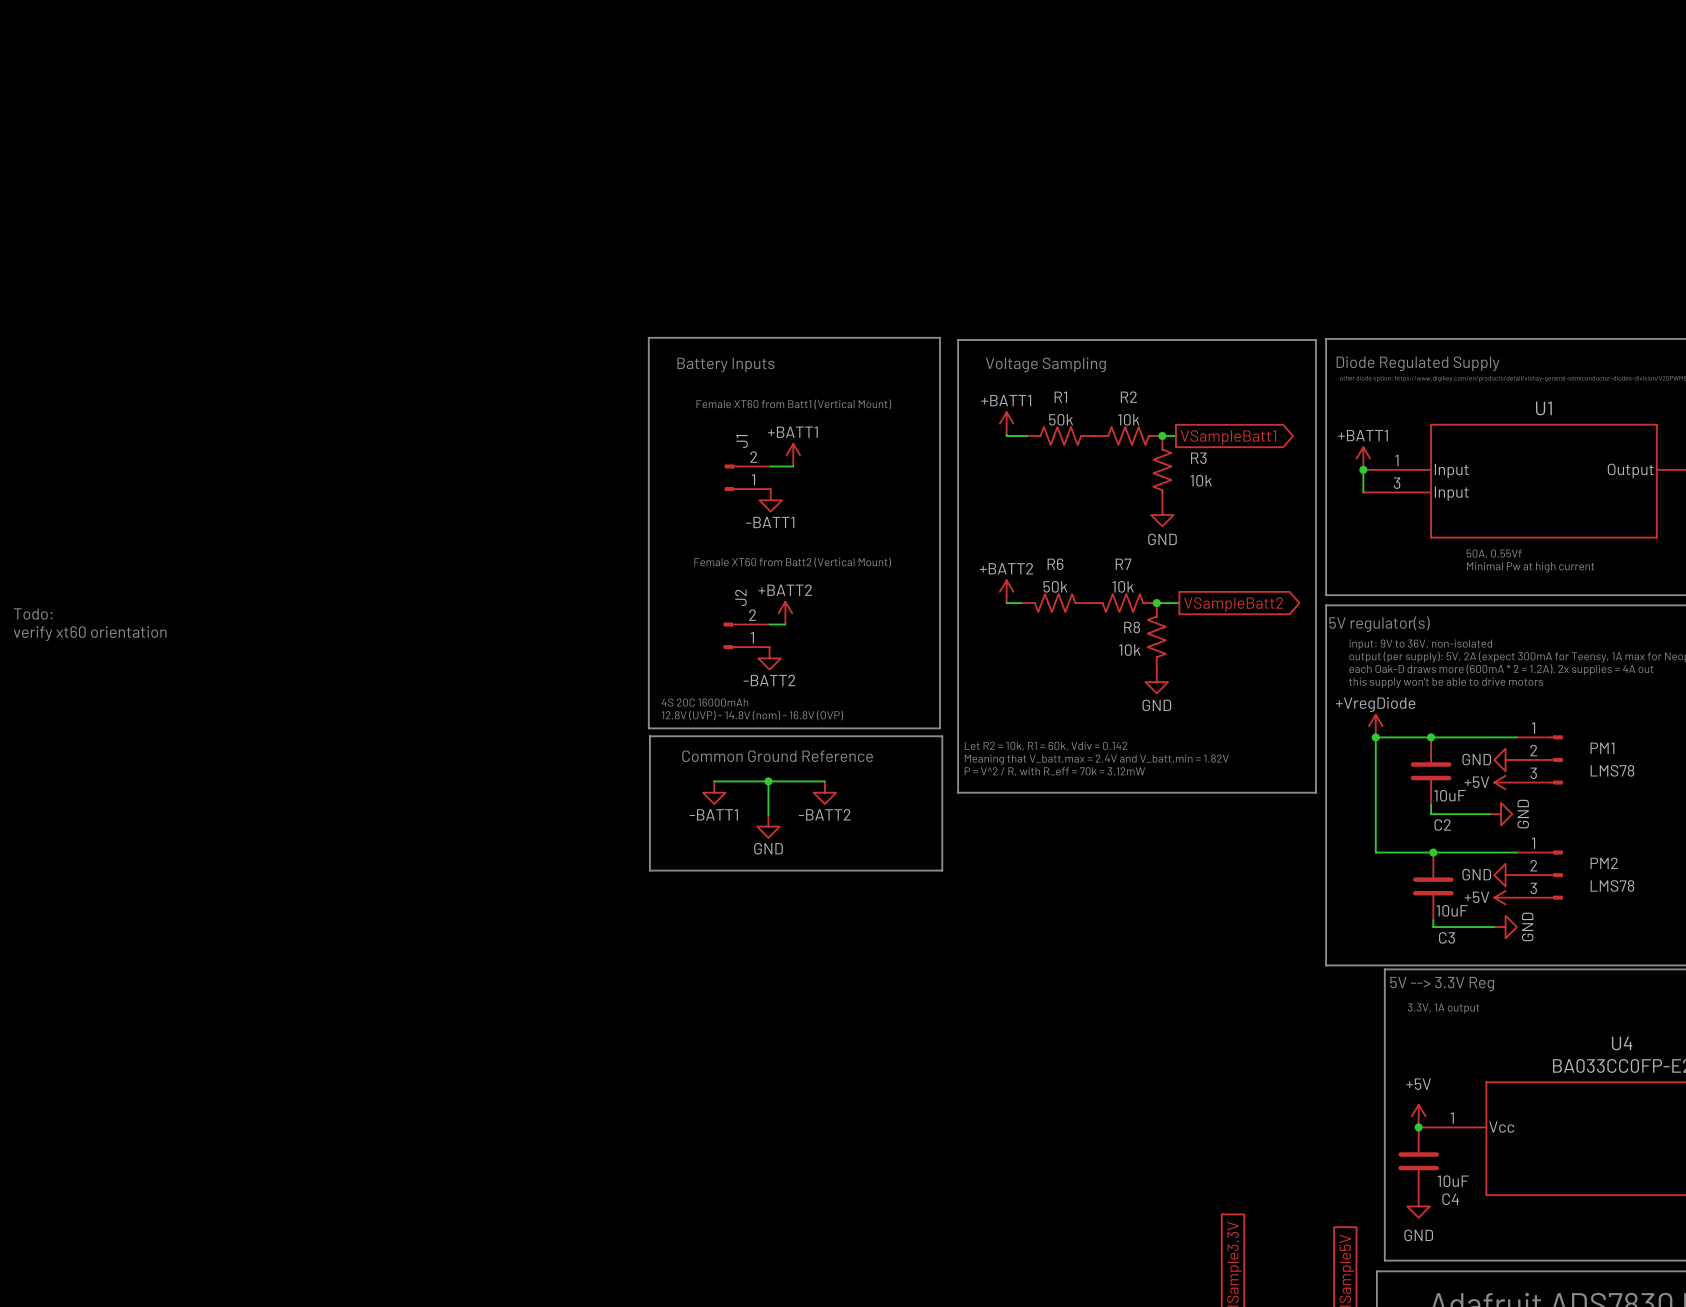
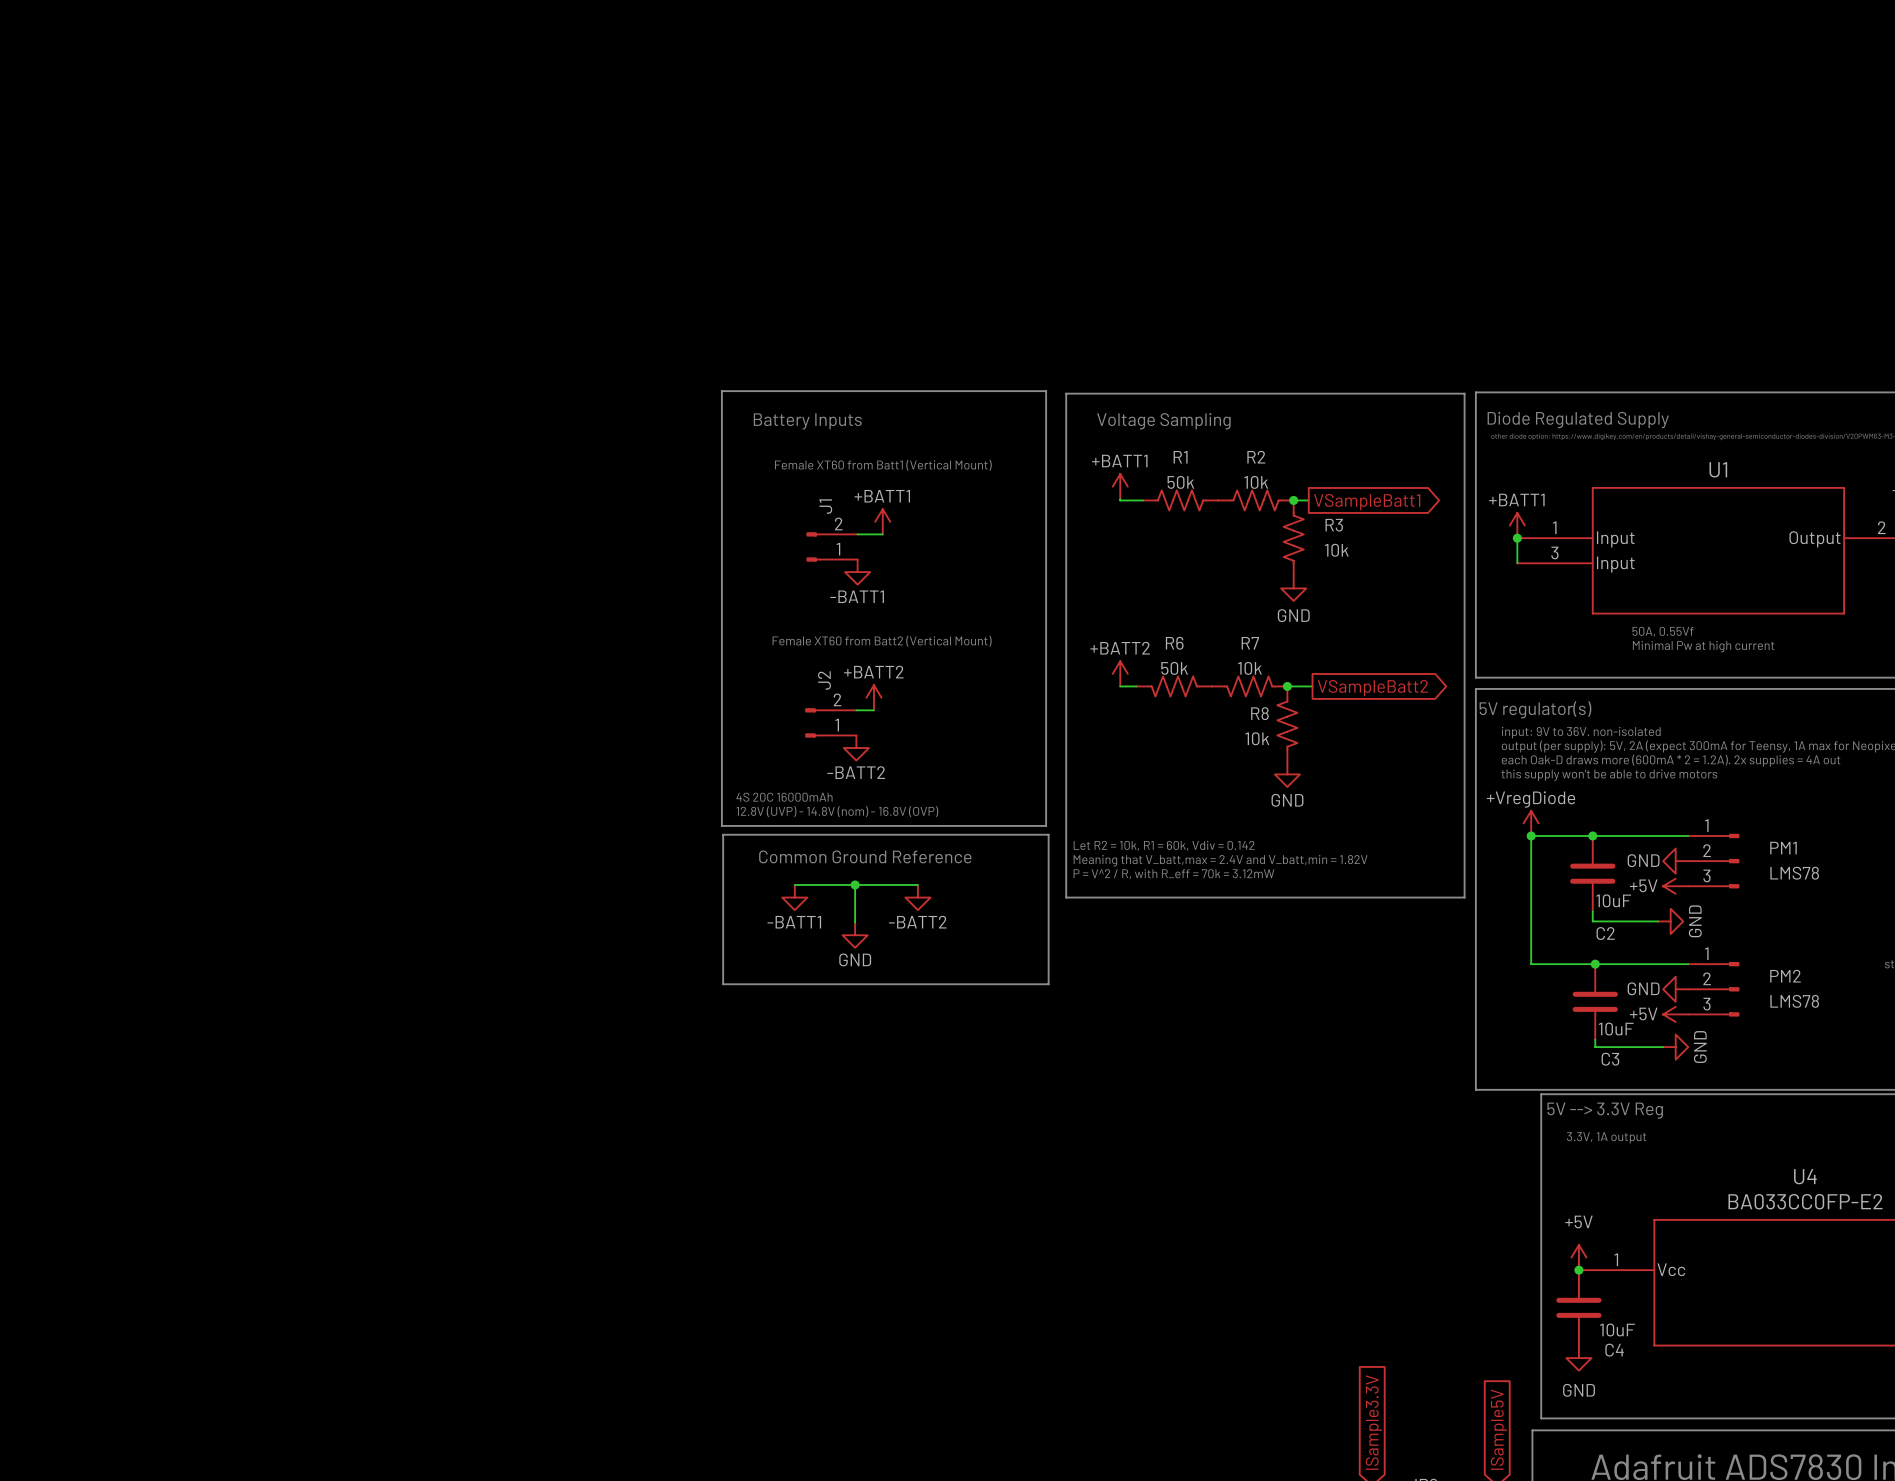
text: Todo: (33, 613) -> none
text: verify xt60 orientation (90, 633) -> none

